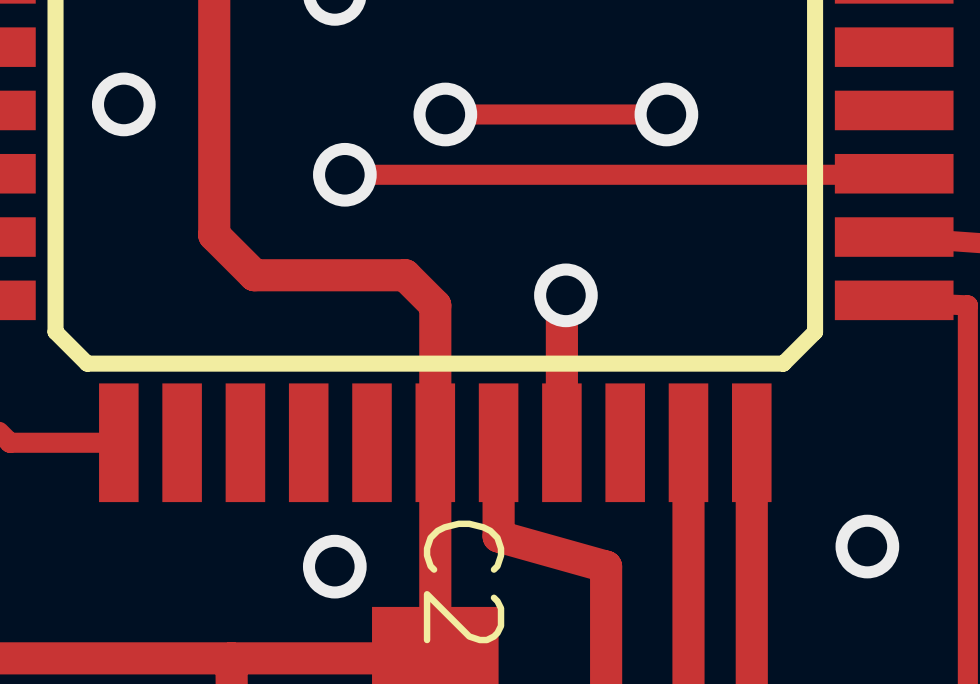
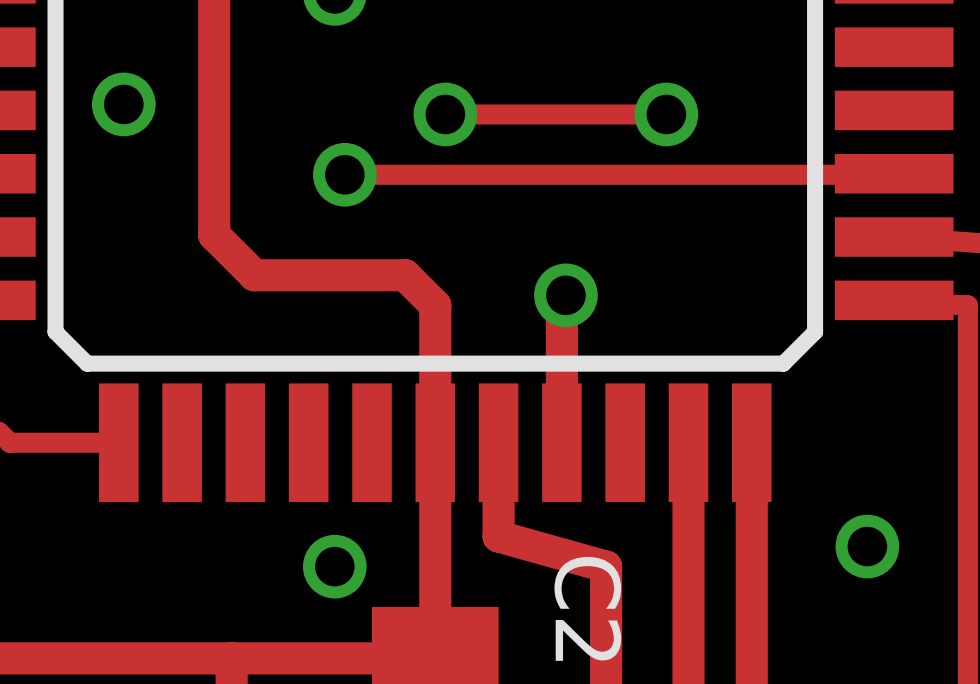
C2 name position: C2 (464, 581) -> C2 (587, 608)

